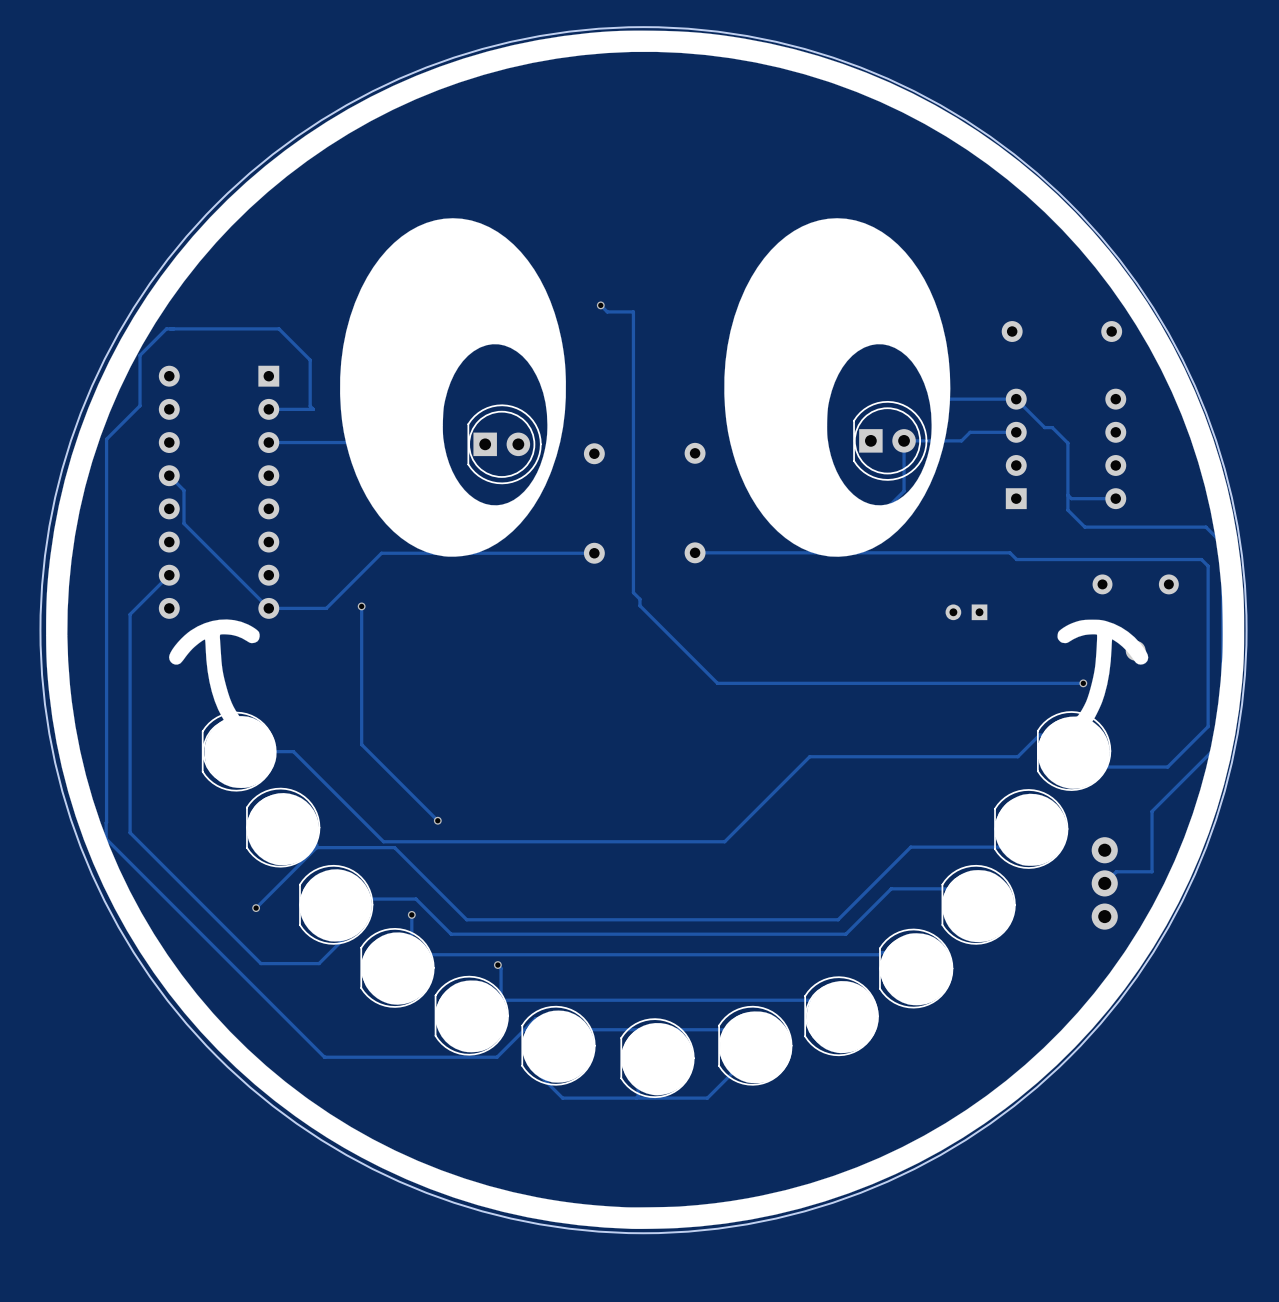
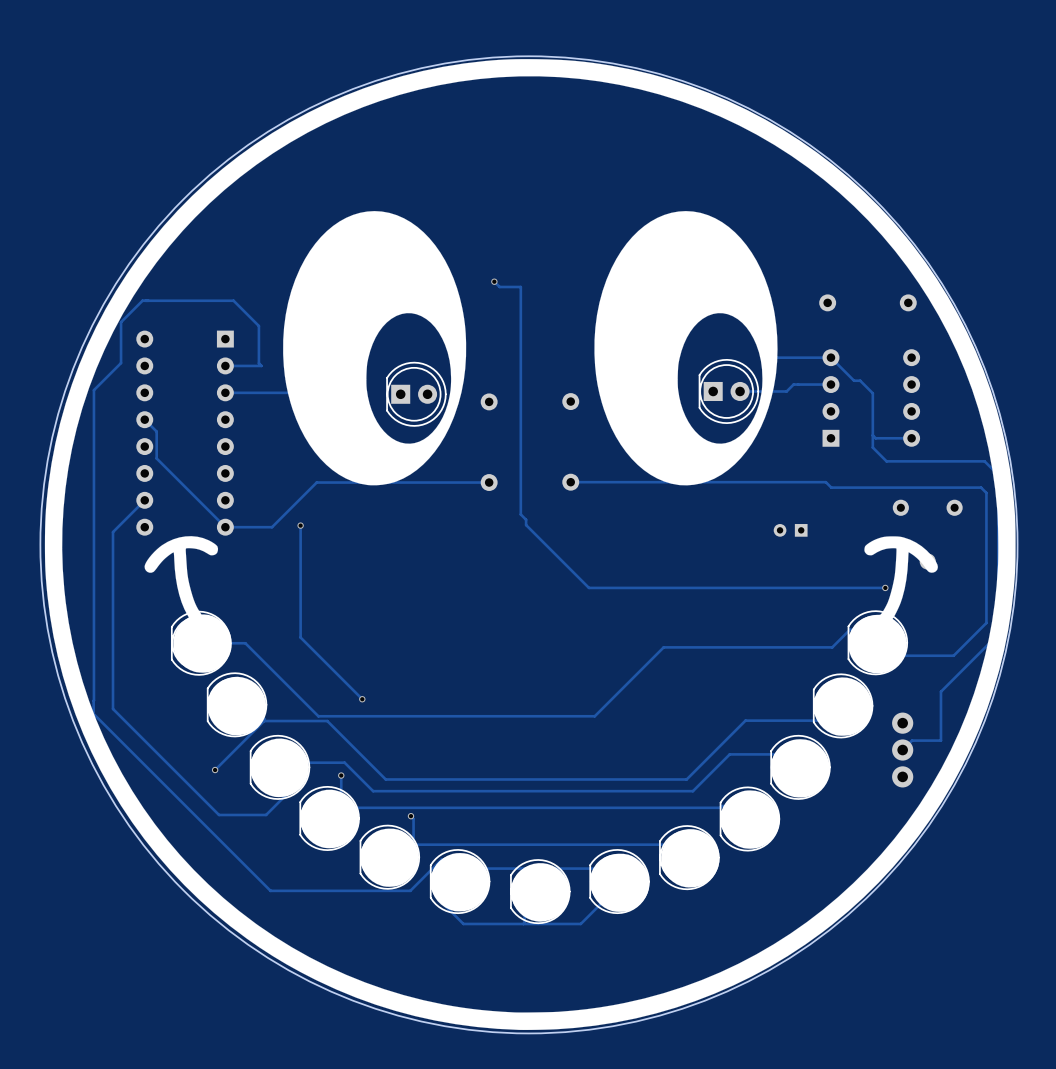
track: (904, 440) (904, 491) (860, 534) -> none

